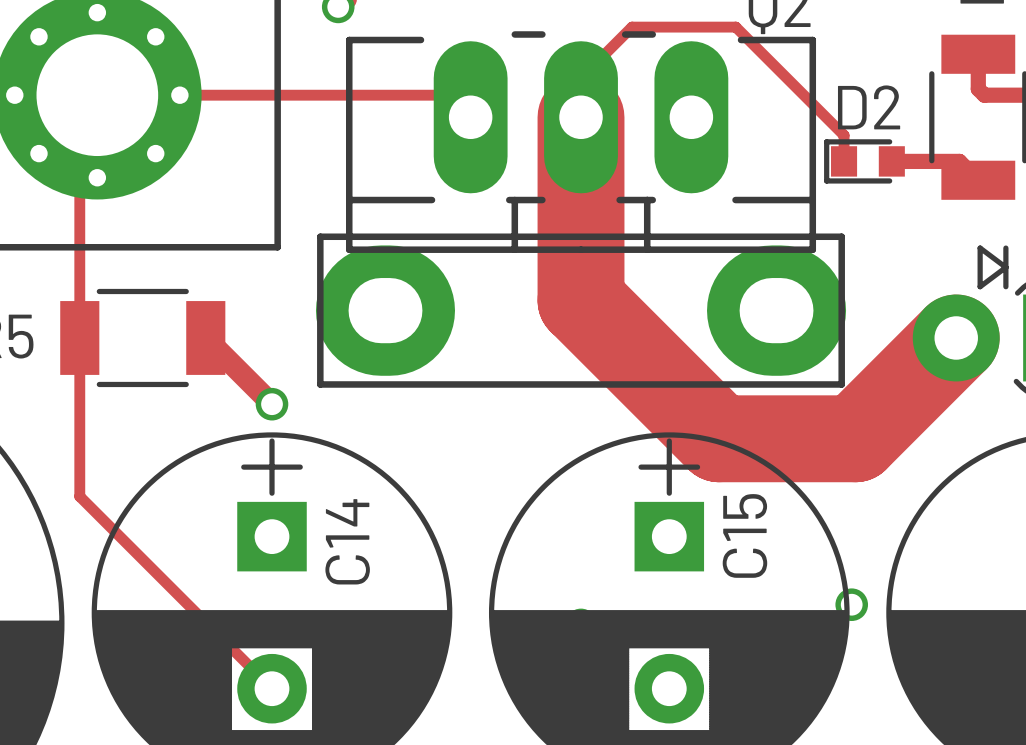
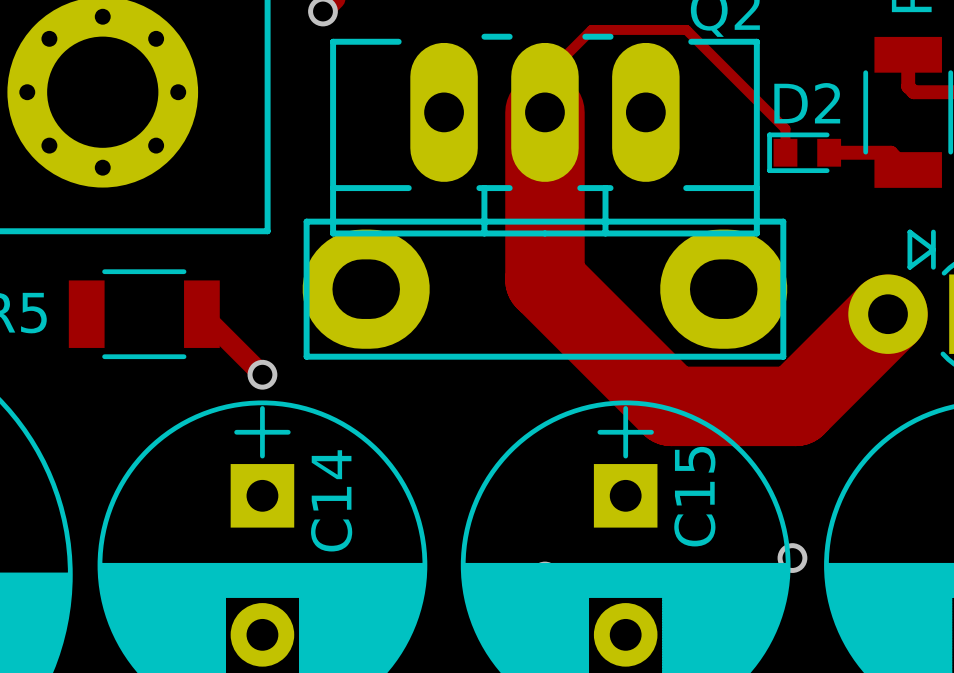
track: (179, 95) (448, 95) -> none
track: (79, 112) (79, 496) (272, 688) -> none

